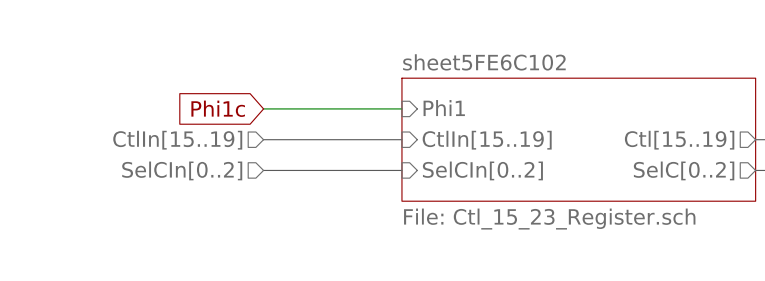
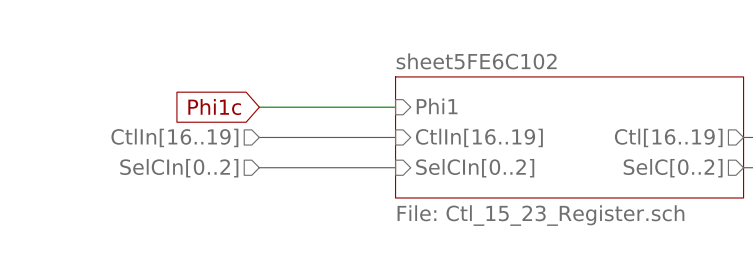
hierarchical label: CtlIn[15..19] (177, 140) -> CtlIn[16..19] (174, 137)
sheet pin: CtlIn[15..19] (487, 140) -> CtlIn[16..19] (479, 137)
sheet pin: Ctl[15..19] (679, 140) -> Ctl[16..19] (668, 137)

